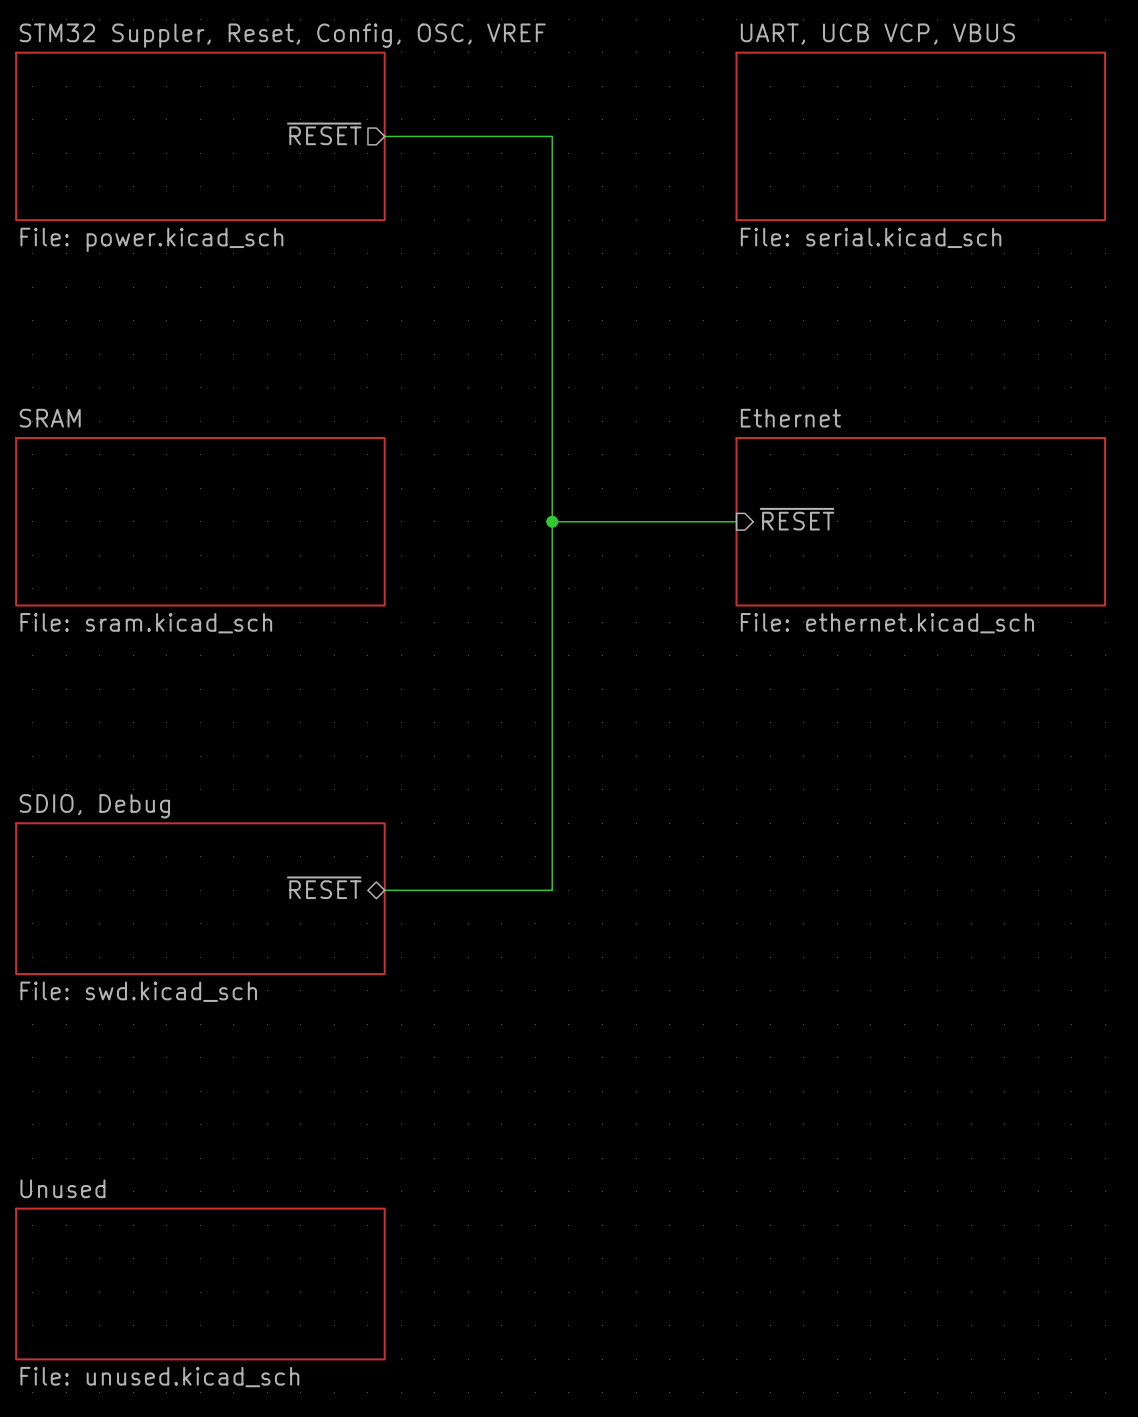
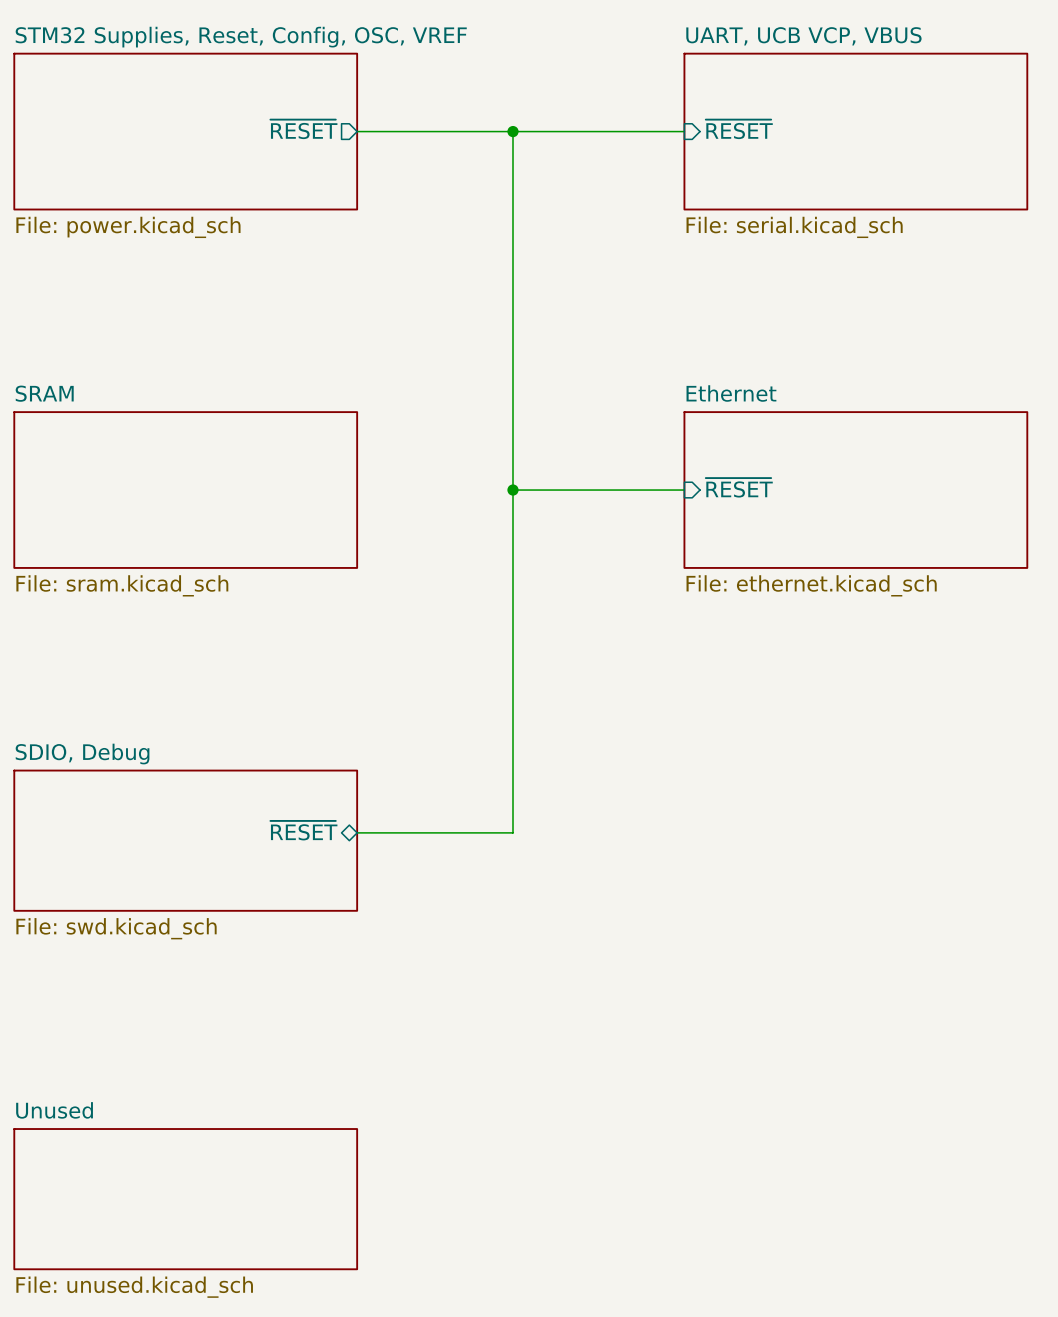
sheet STM32 Suppler, Reset, Config, OSC, VREF name: STM32 Suppler, Reset, Config, OSC, VREF (282, 35) -> STM32 Supplies, Reset, Config, OSC, VREF (241, 37)
sheet pin: none -> ~{RESET} (739, 129)
wire: none -> (512, 131) (684, 131)
junction: none -> (512, 131)

